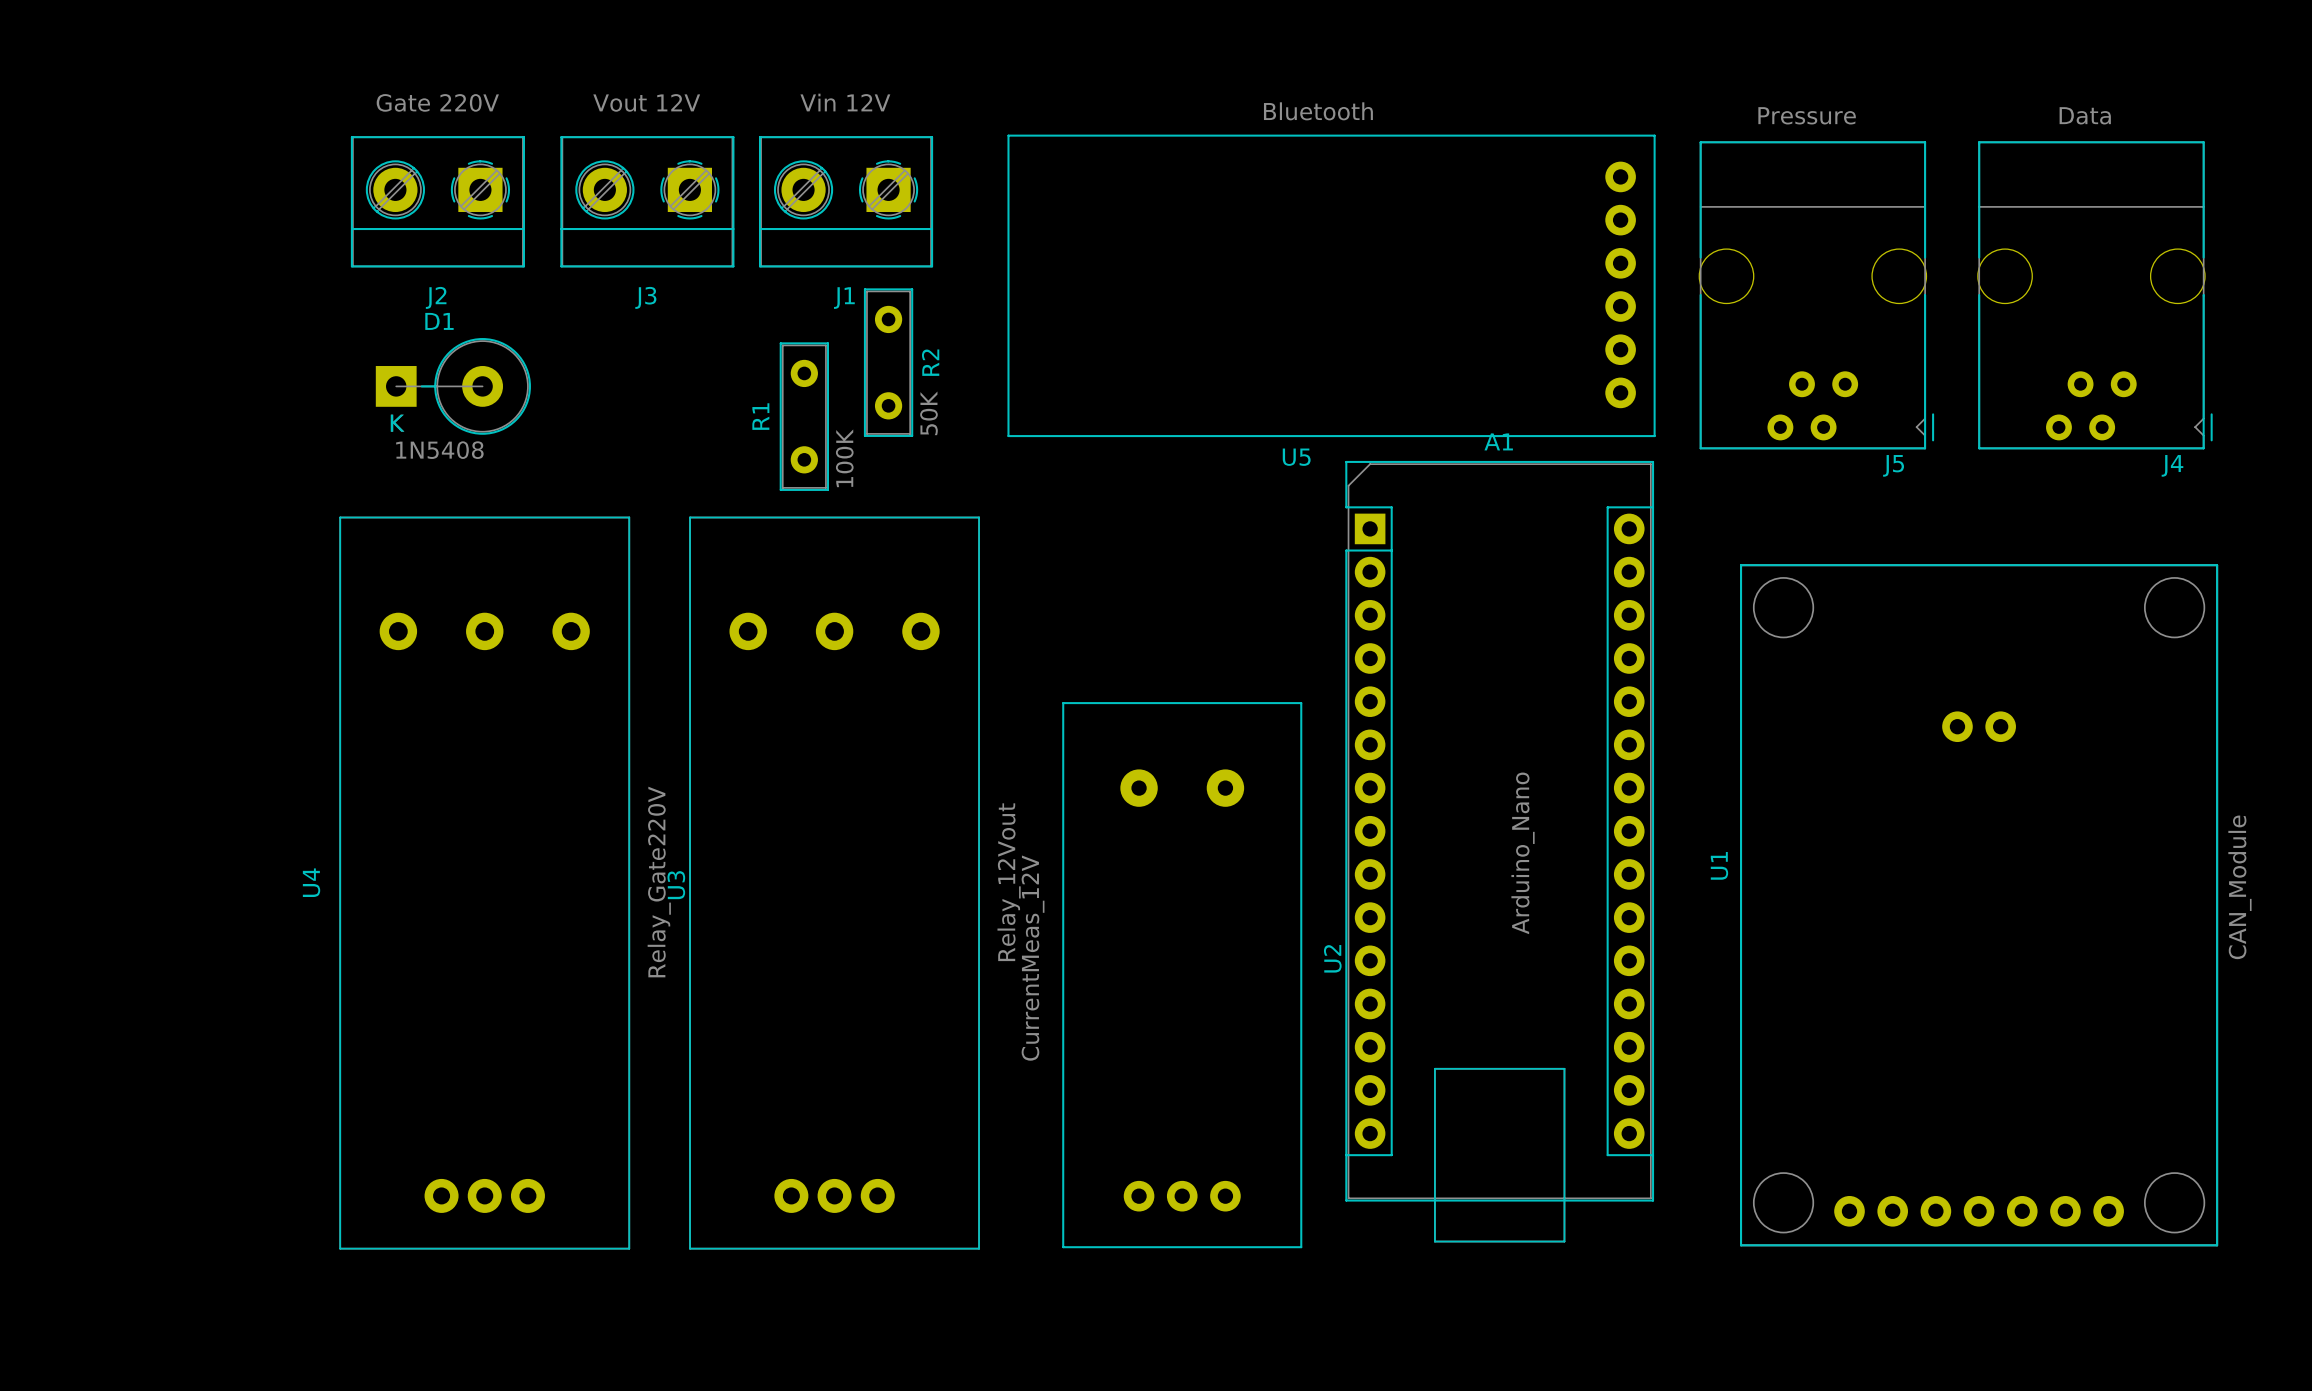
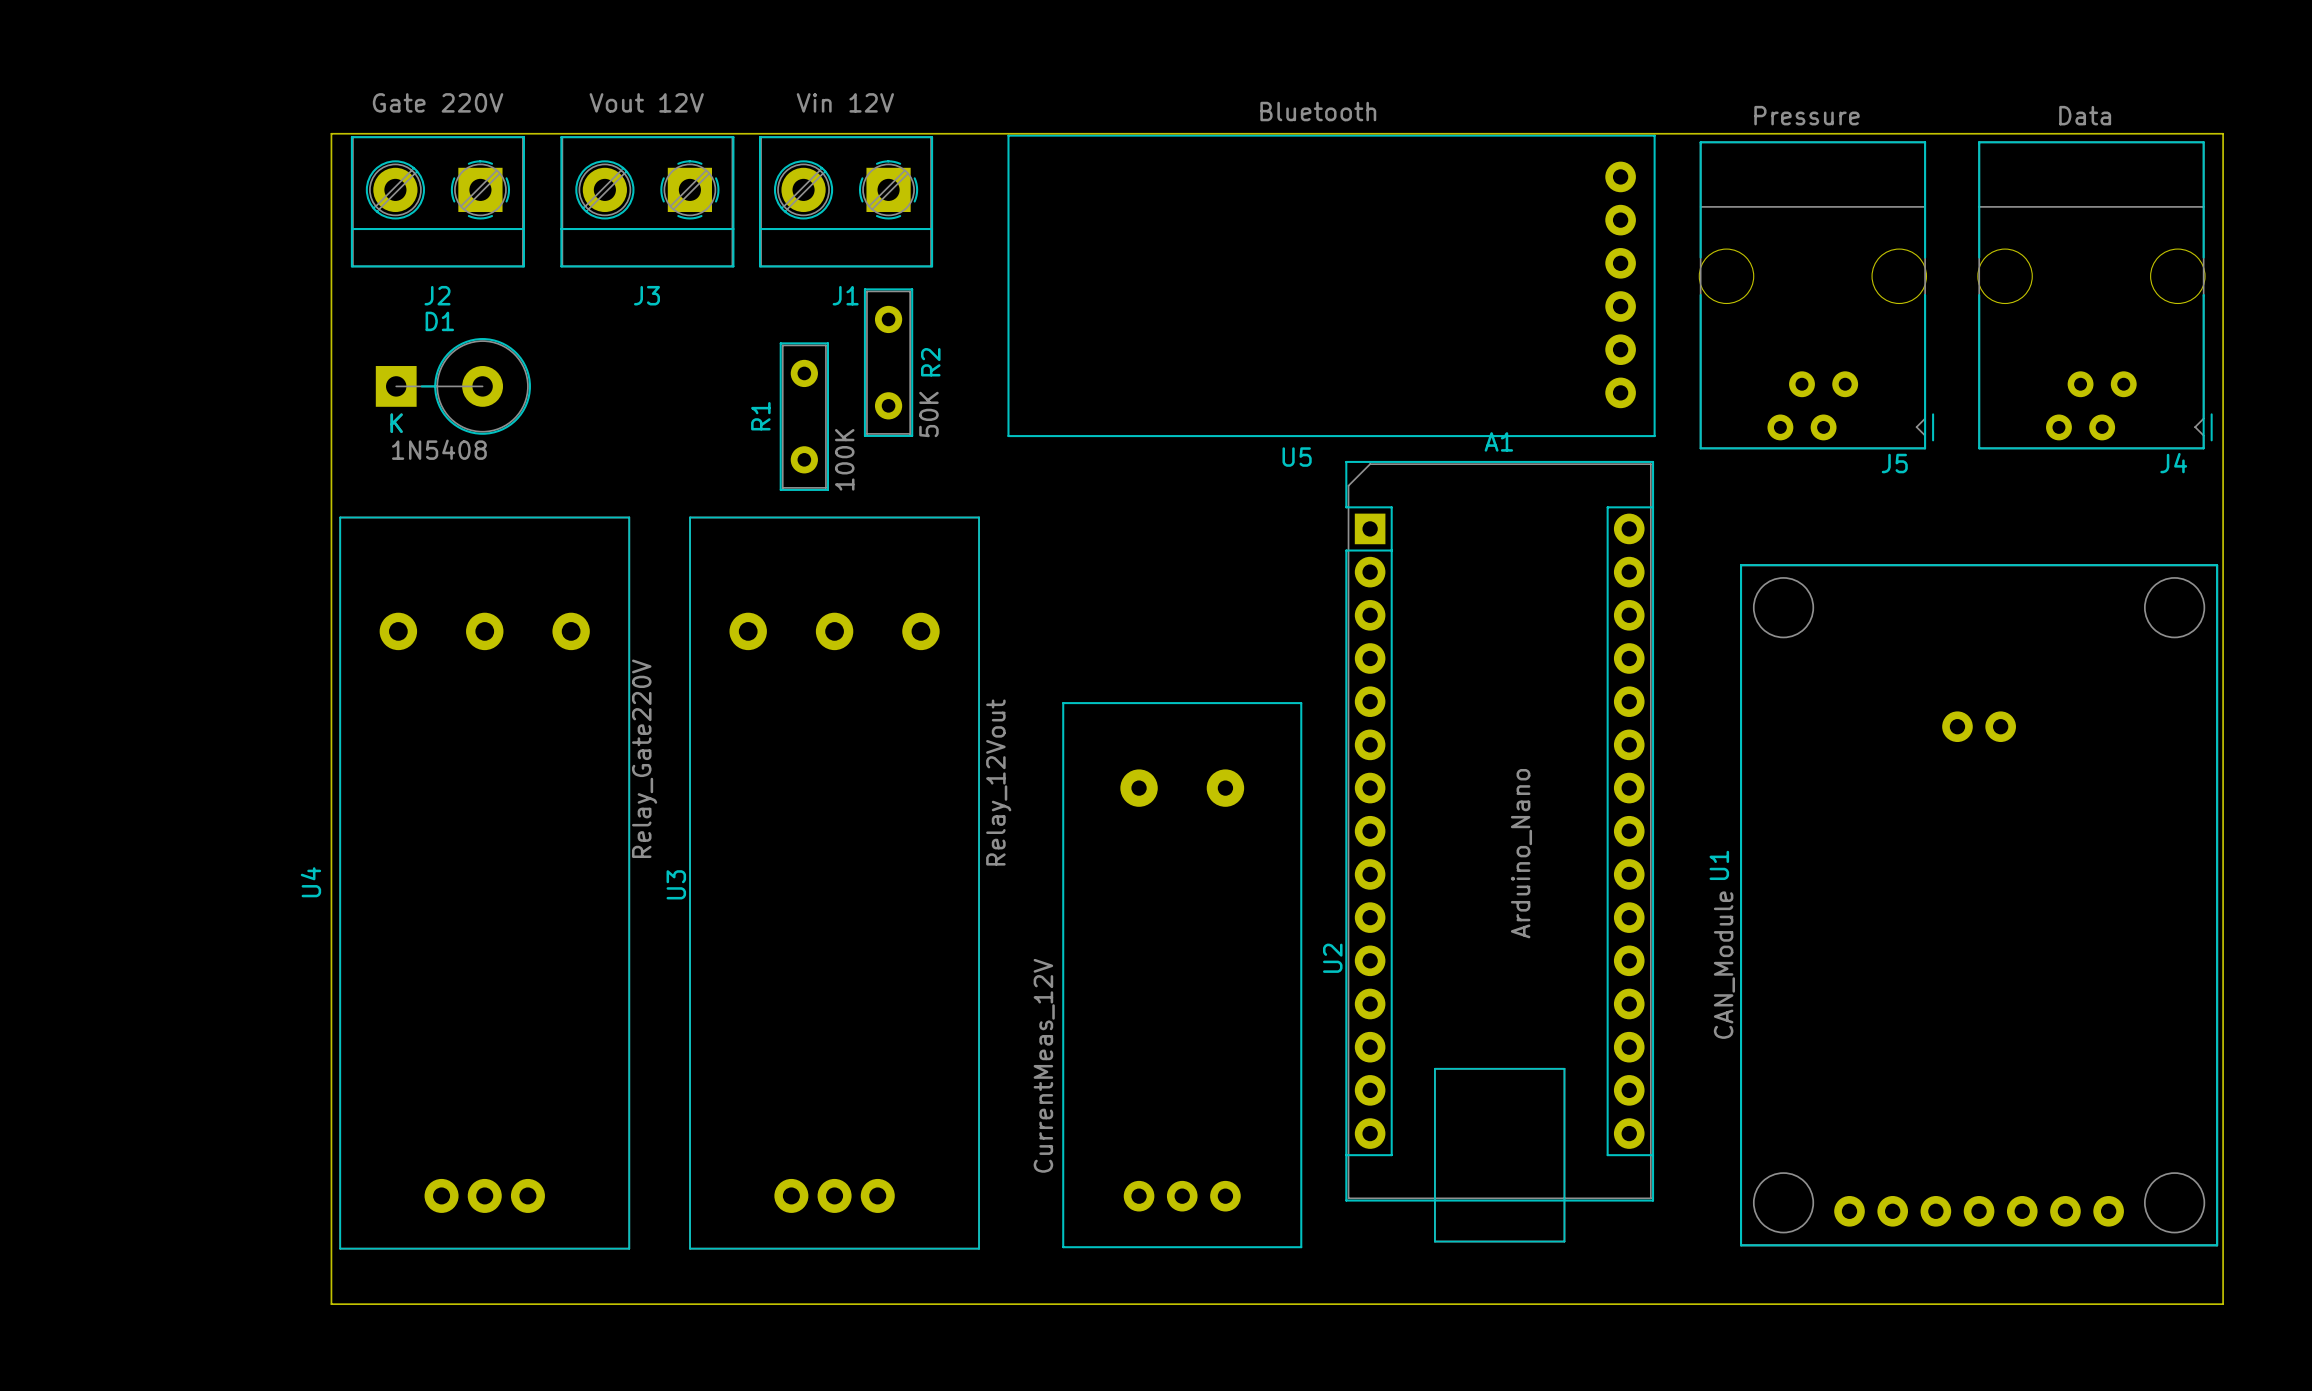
board edge: none -> (331, 133) (331, 1304) (2223, 1304) (2223, 133) (331, 133)
U4 value position: Relay_Gate220V (659, 882) -> Relay_Gate220V (644, 758)
U3 value position: Relay_12Vout (1009, 882) -> Relay_12Vout (998, 782)
U1 value position: CAN_Module (2239, 887) -> CAN_Module (1724, 965)
U2 value position: CurrentMeas_12V (1033, 958) -> CurrentMeas_12V (1044, 1065)

